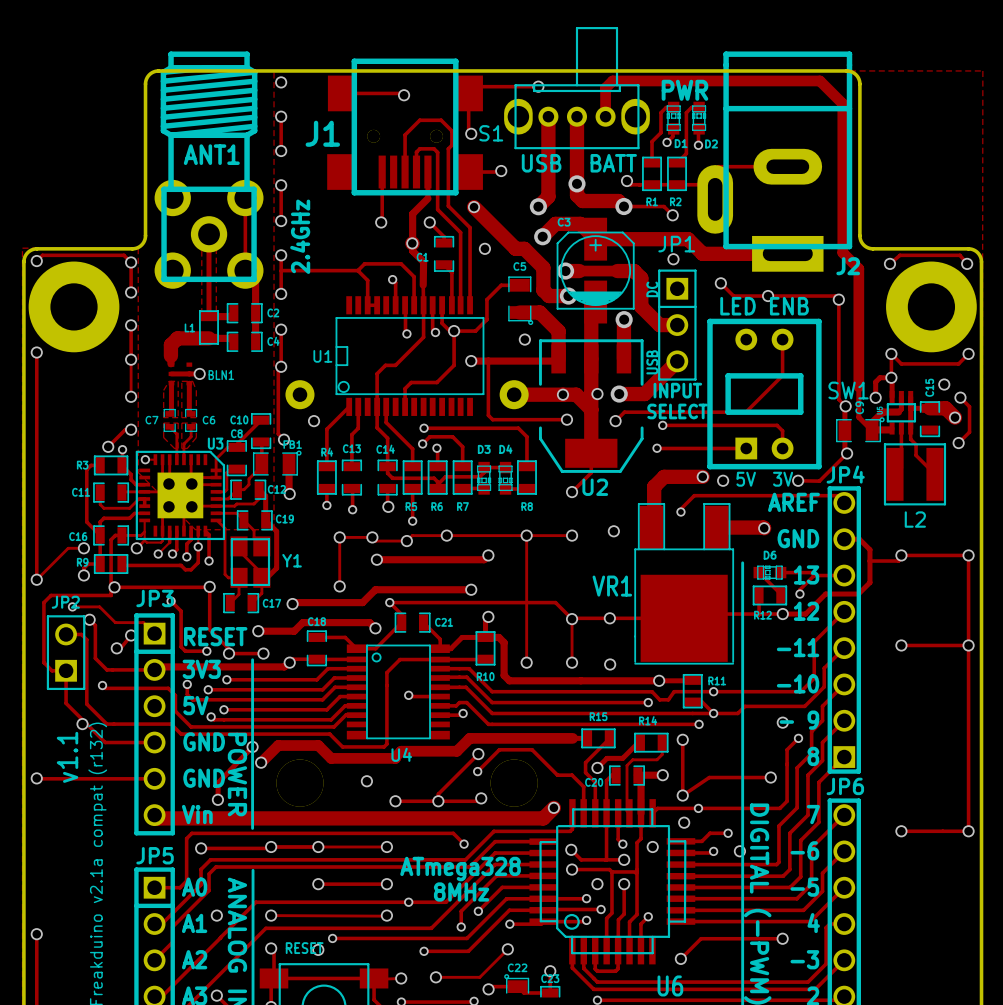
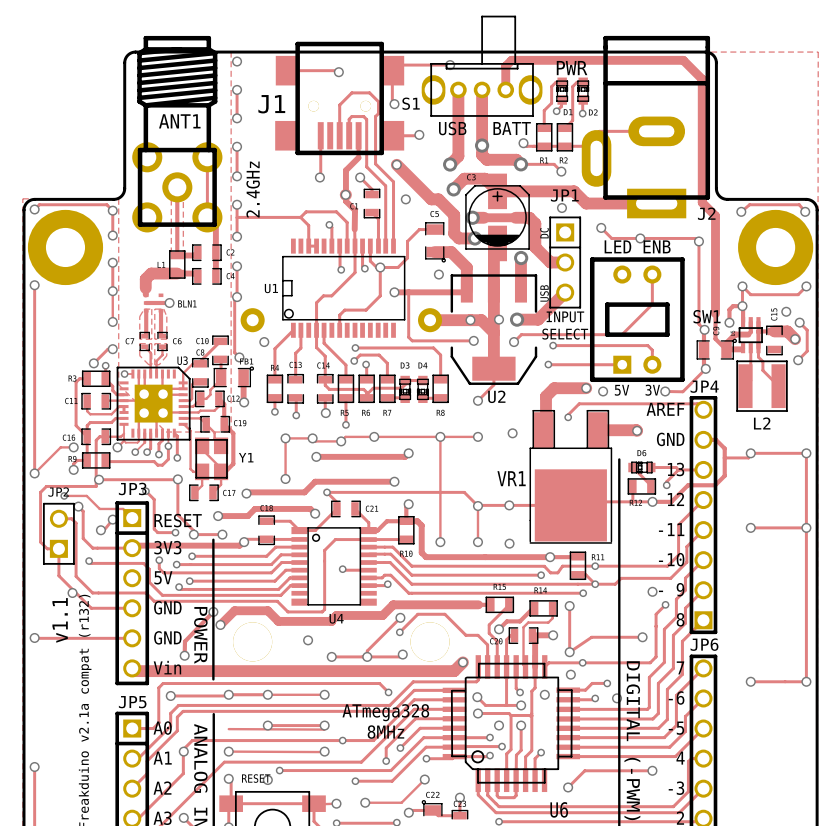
track: none -> (228, 729) (324, 729)
track: (255, 902) (216, 942) -> (216, 740) (192, 740) (183, 749) (183, 773)

